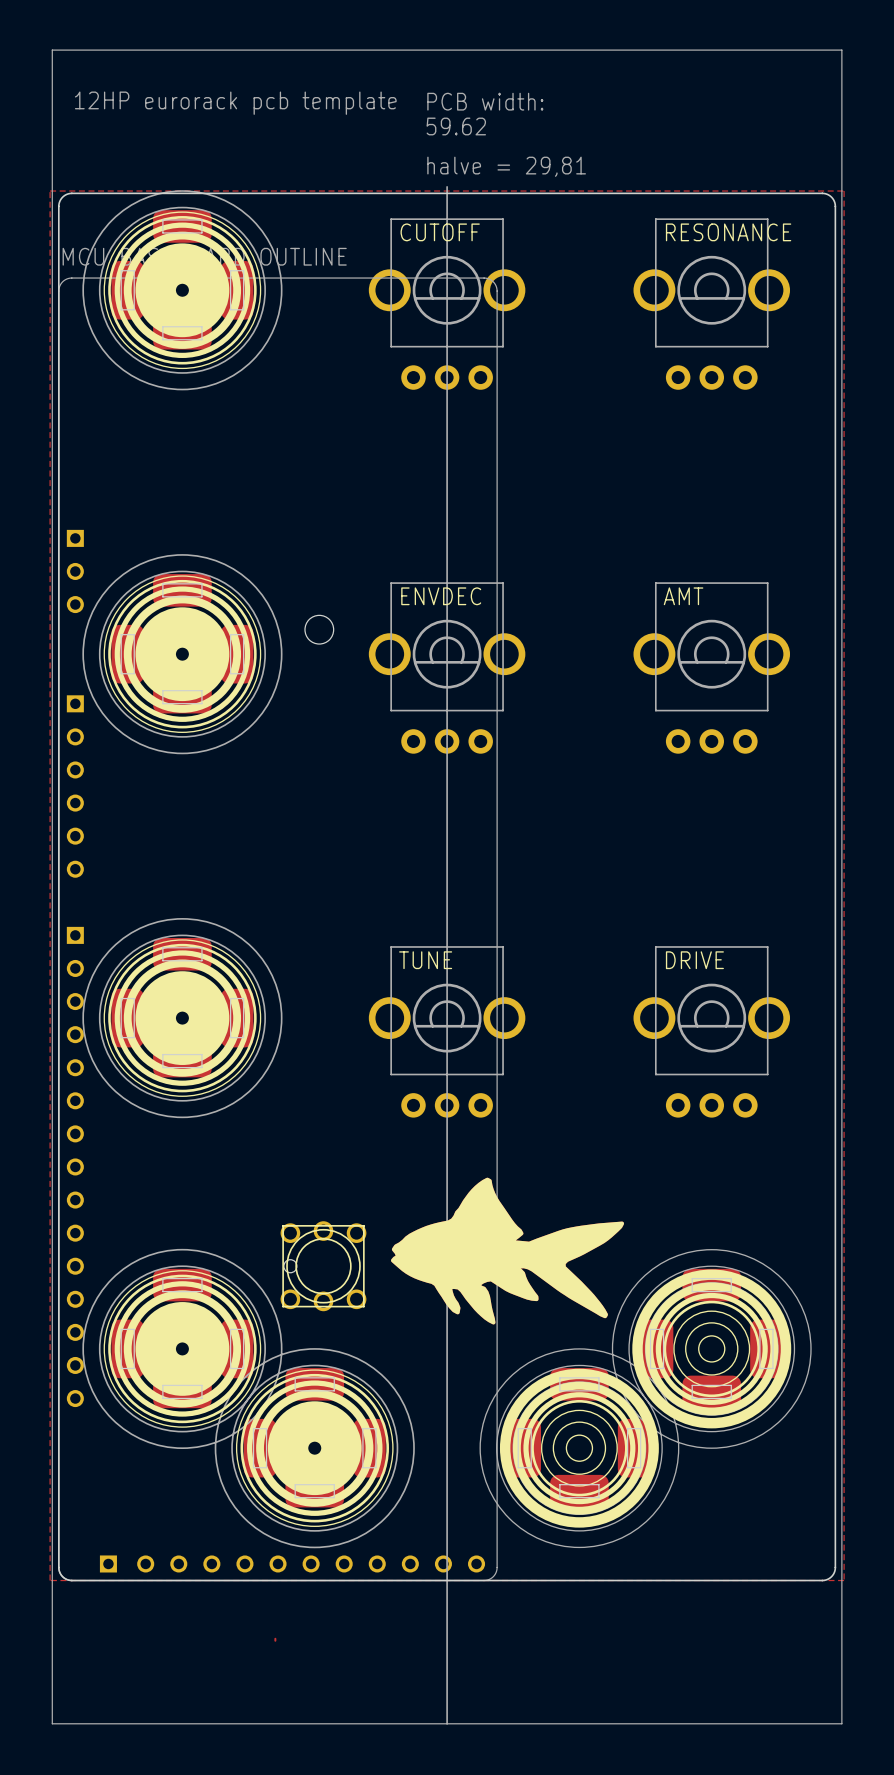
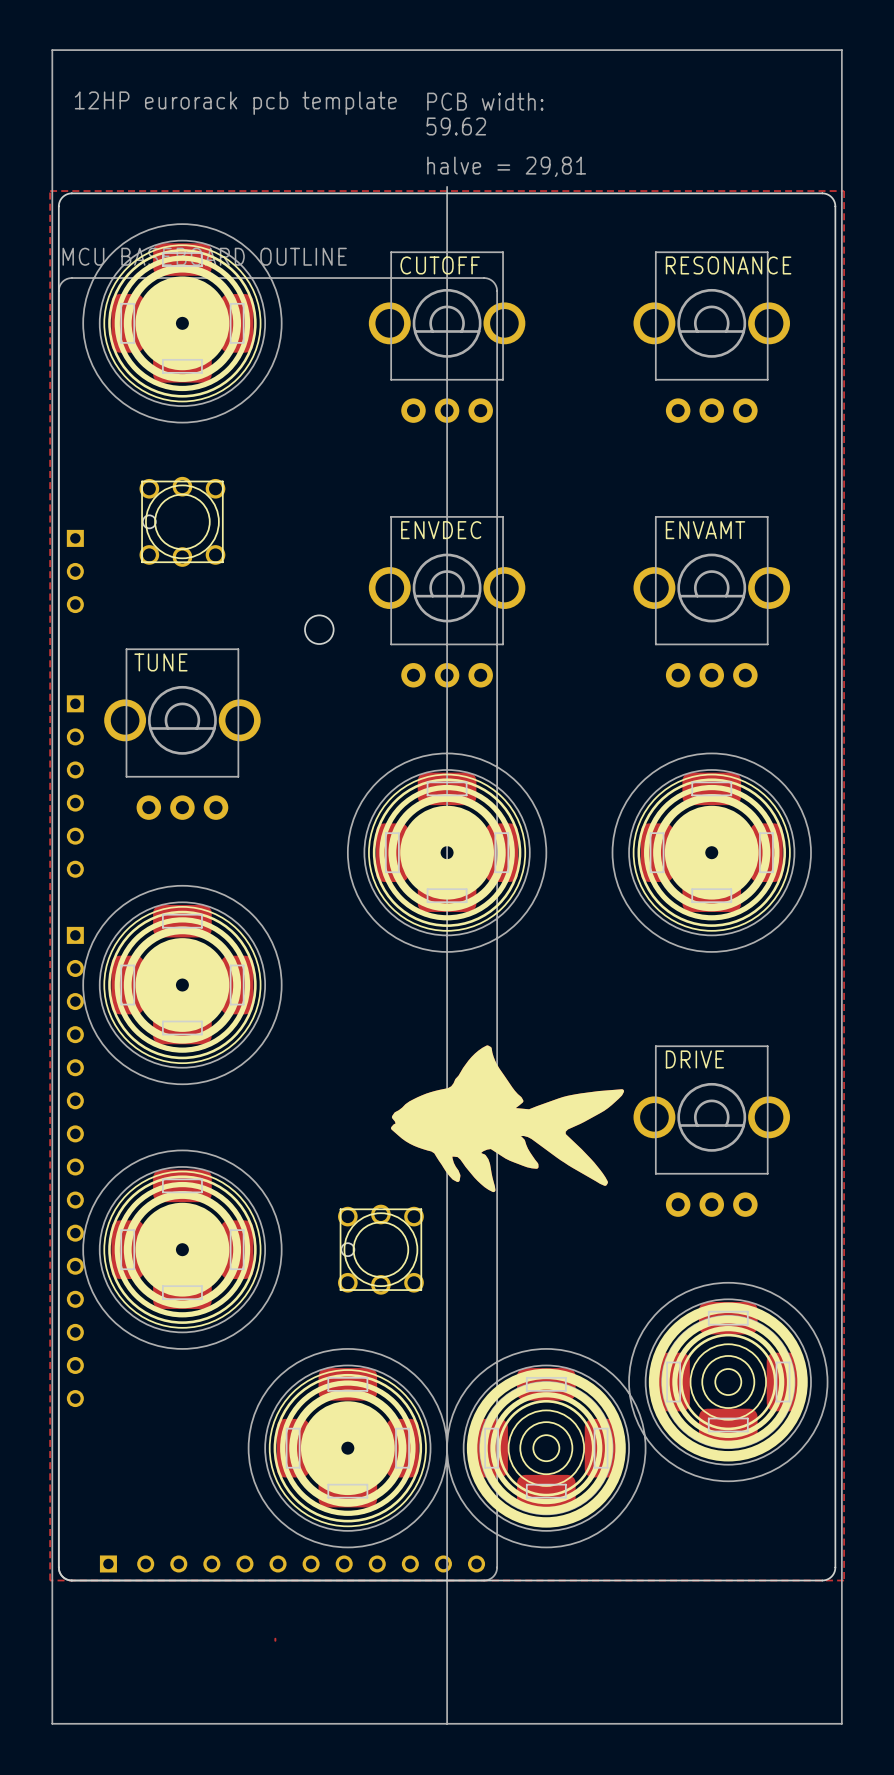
part position: (182, 290) -> (182, 323)
CUTOFF position: (447, 304) -> (447, 337)
RESONANCE position: (711, 304) -> (711, 337)
part: none -> (182, 521)
ENVAMT: none -> (711, 601)
part: (182, 654) -> none
ENVDEC position: (447, 667) -> (447, 601)
AMT: (711, 667) -> none
TUNE: none -> (182, 734)
part: none -> (447, 852)
part: none -> (711, 852)
part position: (182, 1018) -> (182, 985)
TUNE: (447, 1031) -> none
DRIVE position: (711, 1031) -> (711, 1131)
part: none -> (182, 1249)
drawing position: (507, 1251) -> (507, 1118)
part position: (323, 1266) -> (380, 1249)
part: (182, 1348) -> none
part position: (711, 1348) -> (728, 1382)
part position: (314, 1448) -> (347, 1448)
part position: (579, 1448) -> (546, 1448)

